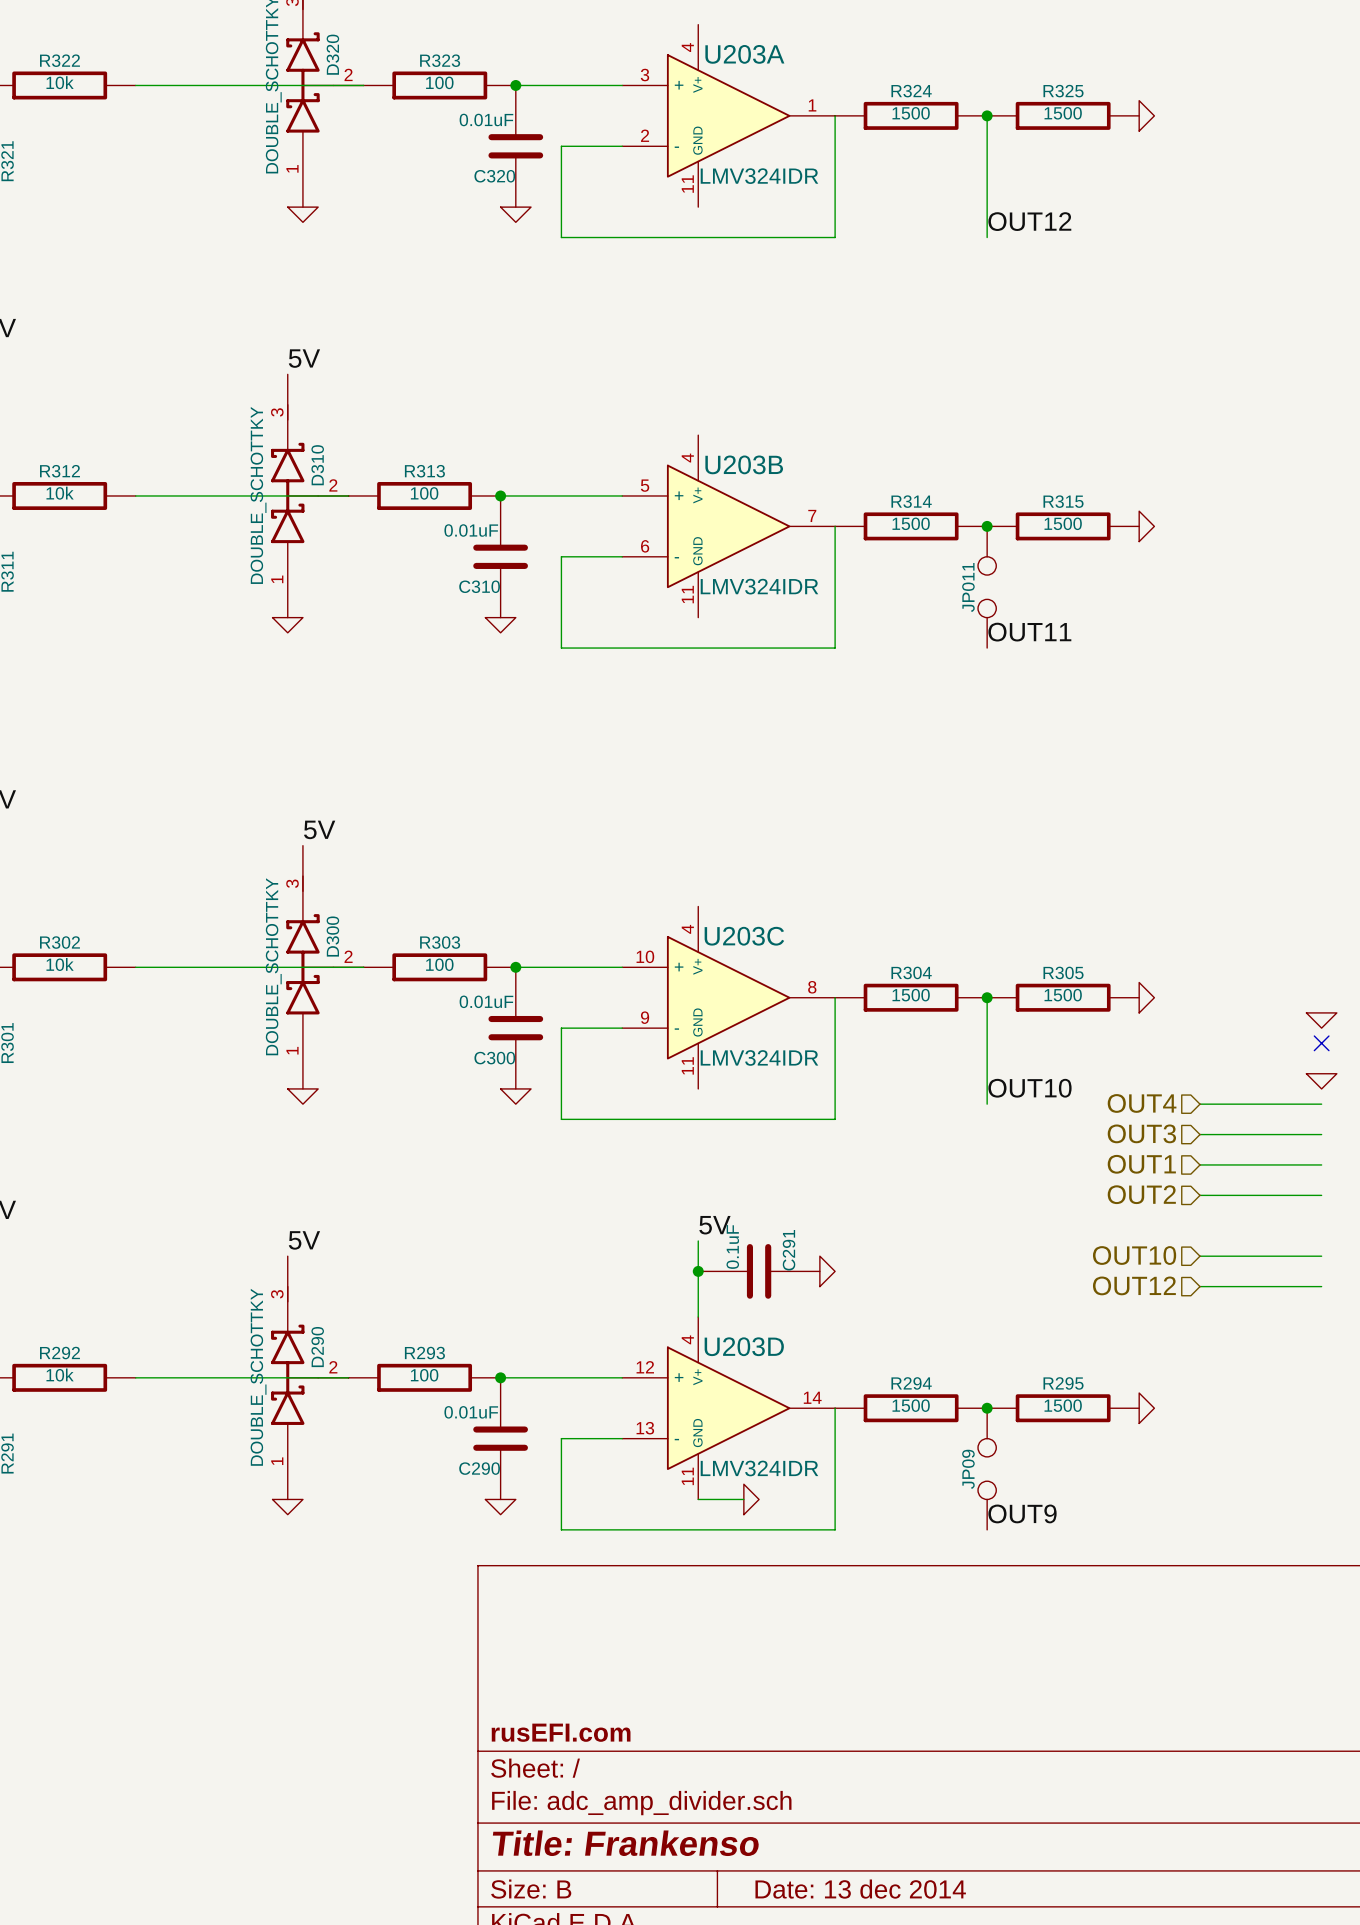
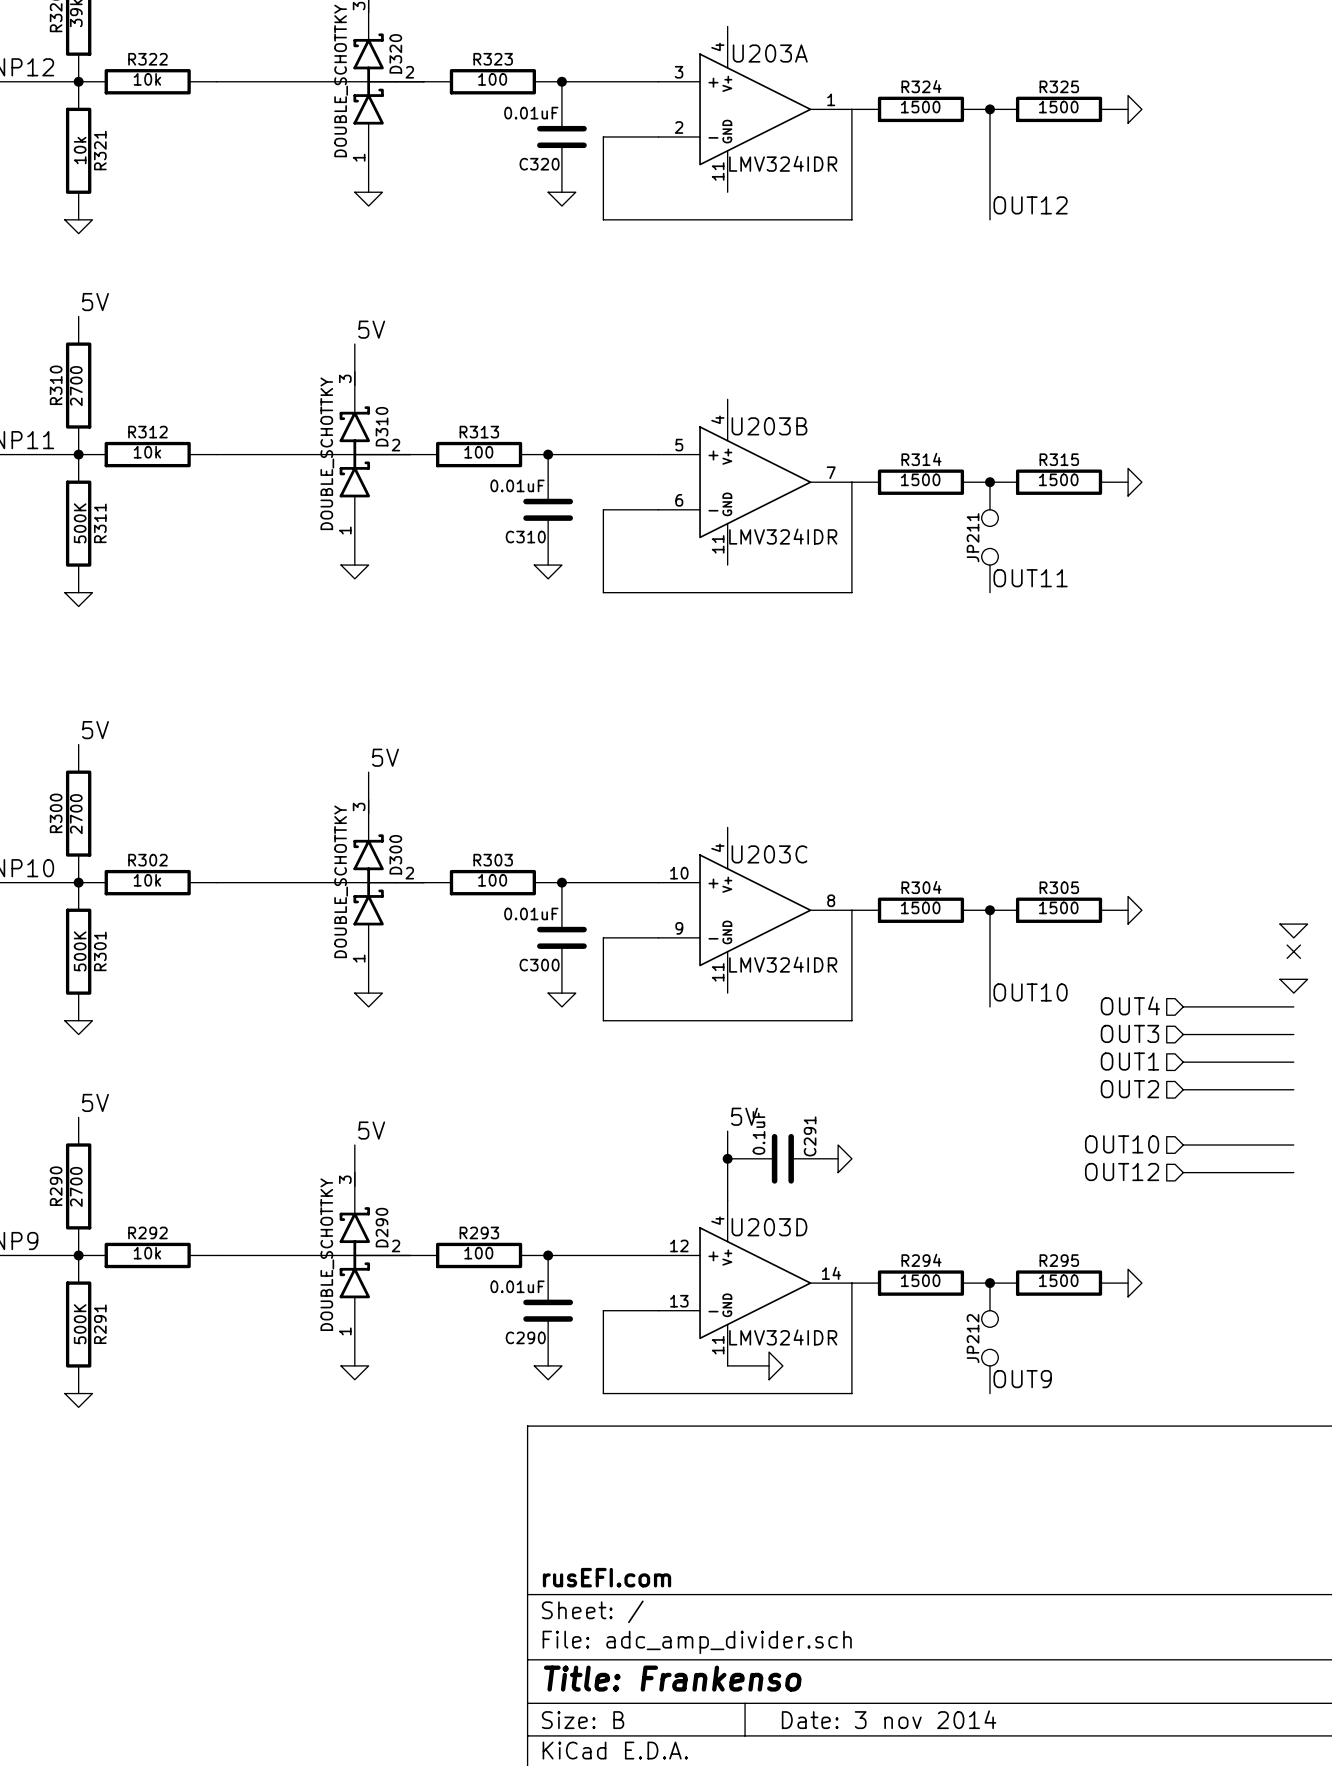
JP011 name: JP011 (968, 587) -> JP211 (973, 537)
JP09 name: JP09 (968, 1469) -> JP212 (973, 1338)
title block: Date: 13 dec 2014 (860, 1889) -> Date: 3 nov 2014 (889, 1719)

